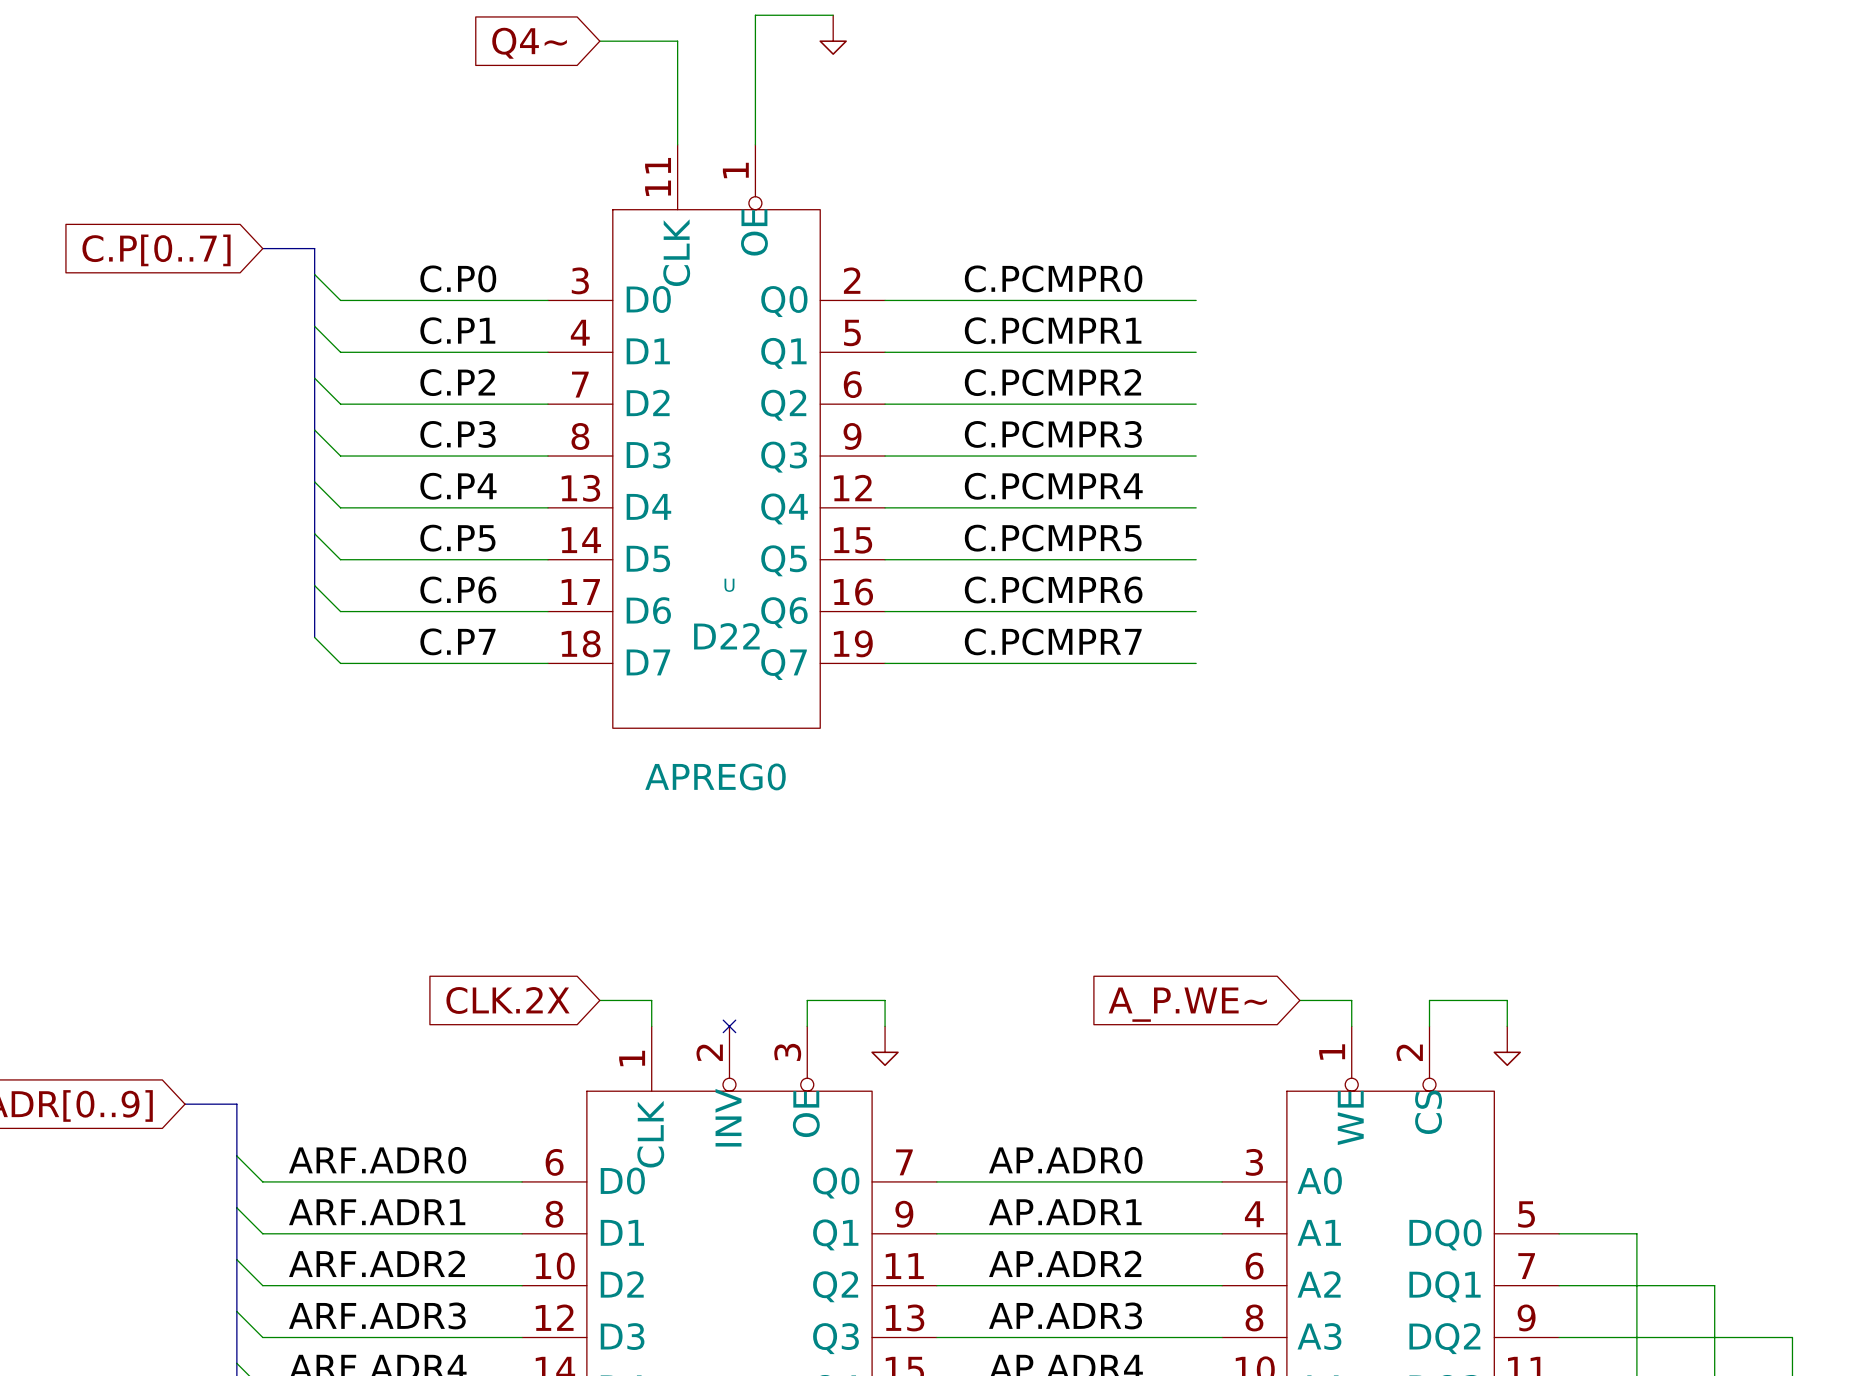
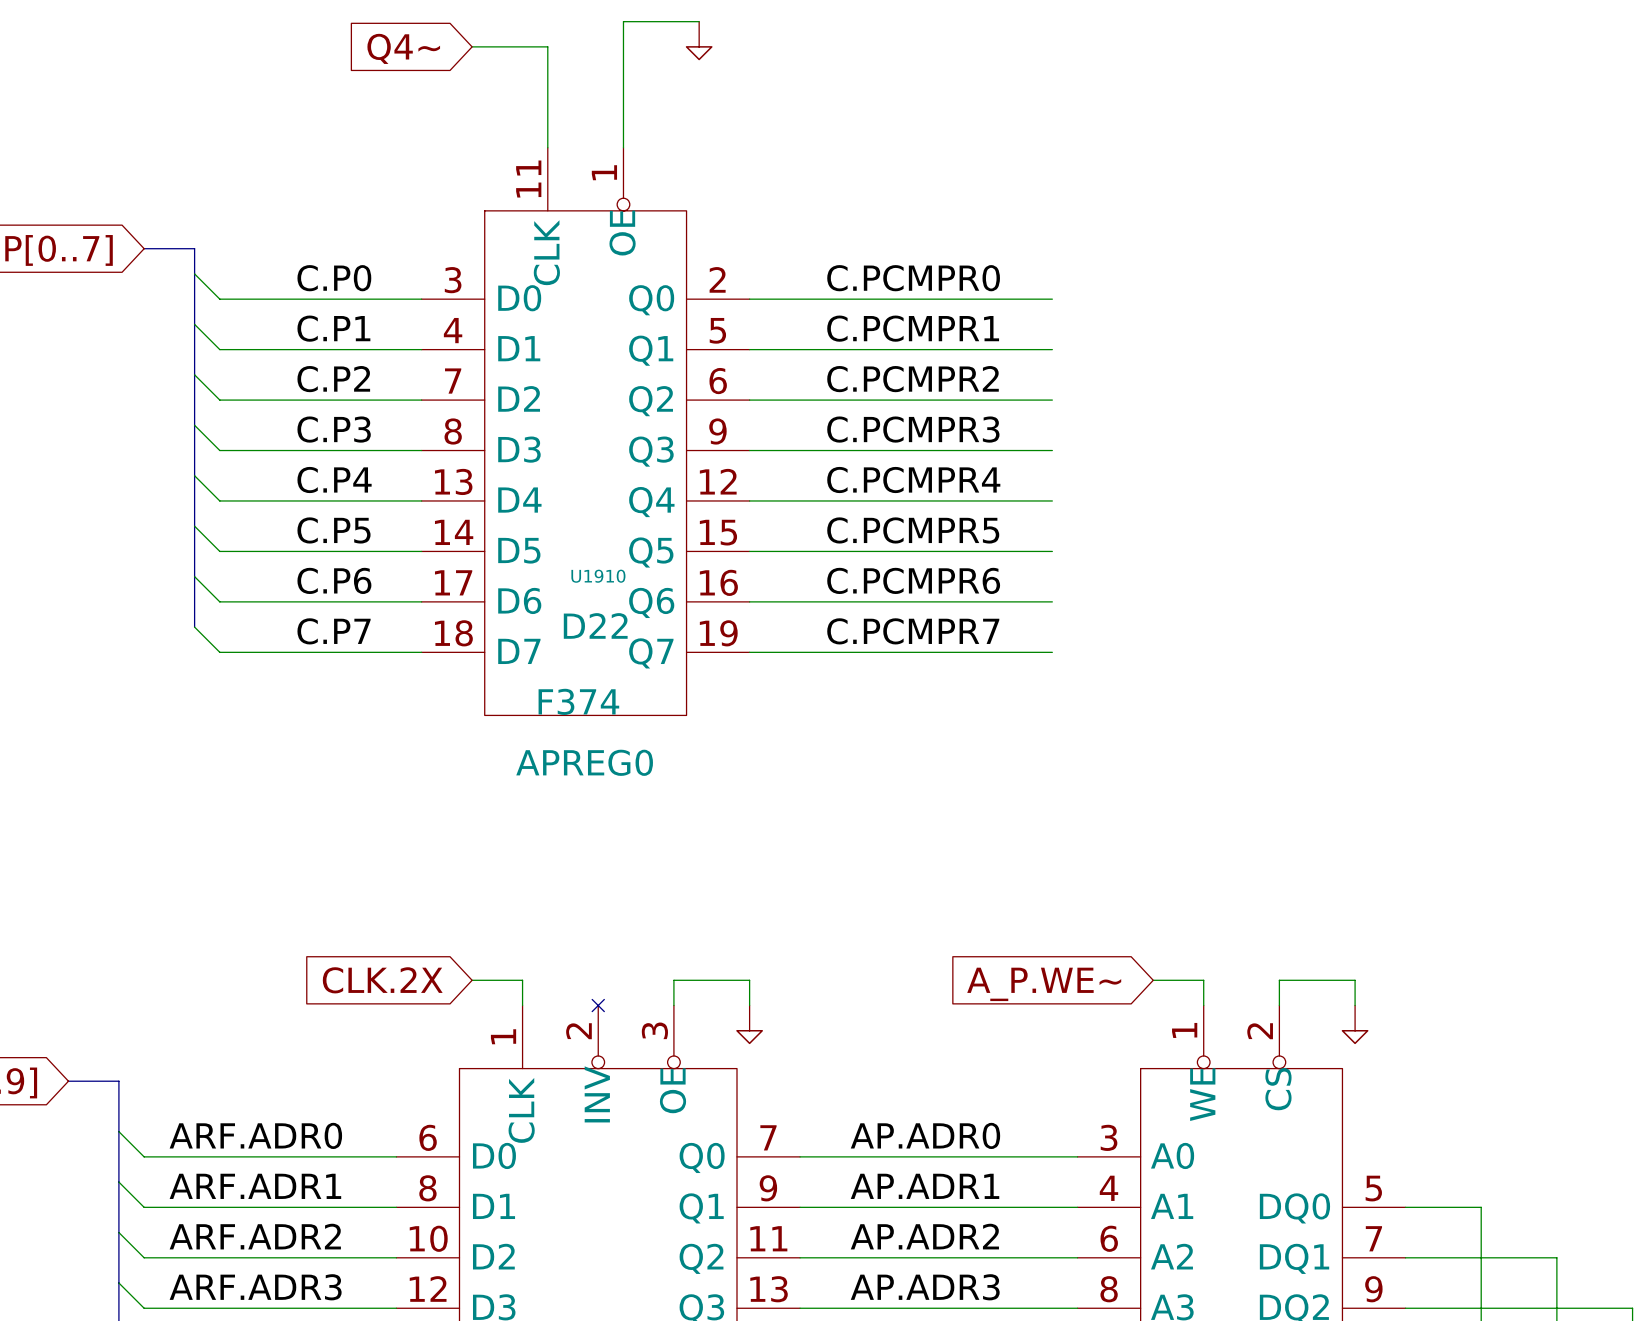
U name: U (729, 585) -> U1910 (598, 576)
U value: none -> F374 (578, 701)

